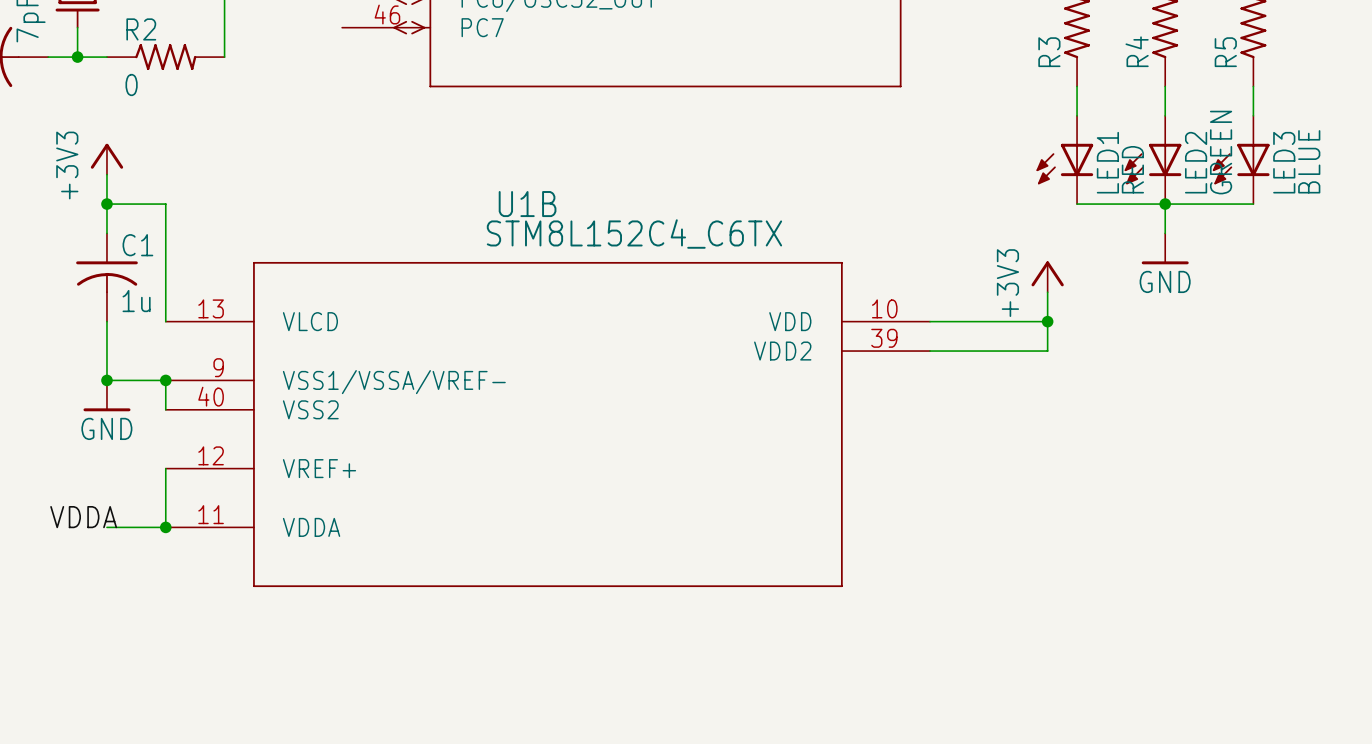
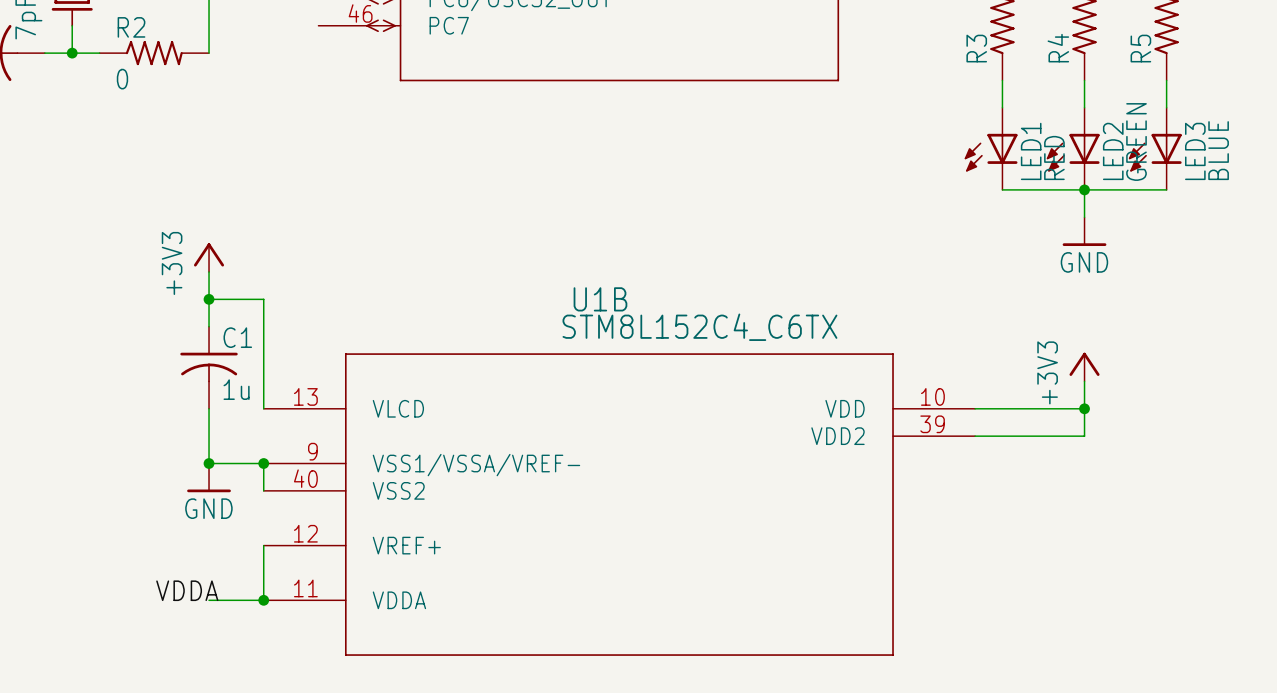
power symbol position: +3V3 (106, 159) -> +3V3 (209, 257)
wire: (106, 174) (106, 233) -> (209, 272) (209, 326)
wire: (106, 204) (165, 204) (165, 321) -> (209, 299) (263, 299) (263, 408)
junction: (106, 204) -> none
power symbol position: +3V3 (1047, 276) -> +3V3 (1084, 367)
C1 position: (106, 277) -> (209, 367)
wire: (1047, 292) (1047, 351) (930, 351) -> (1084, 381) (1084, 436) (975, 436)
wire: (106, 321) (106, 380) (165, 380) (165, 409) -> (209, 408) (209, 463) (263, 463) (263, 490)
junction: none -> (209, 299)
wire: (930, 321) (1047, 321) -> (975, 408) (1084, 408)
junction: (1047, 321) -> none
junction: (106, 380) -> none
junction: (165, 380) -> none
power symbol position: GND (106, 395) -> GND (209, 477)
U1B position: (547, 424) -> (619, 504)
junction: none -> (1084, 408)
wire: (165, 468) (165, 527) (106, 527) -> (263, 545) (263, 600) (209, 600)
junction: none -> (209, 463)
junction: none -> (263, 463)
label position: VDDA (83, 517) -> VDDA (187, 590)
junction: (165, 527) -> none
junction: none -> (263, 600)

